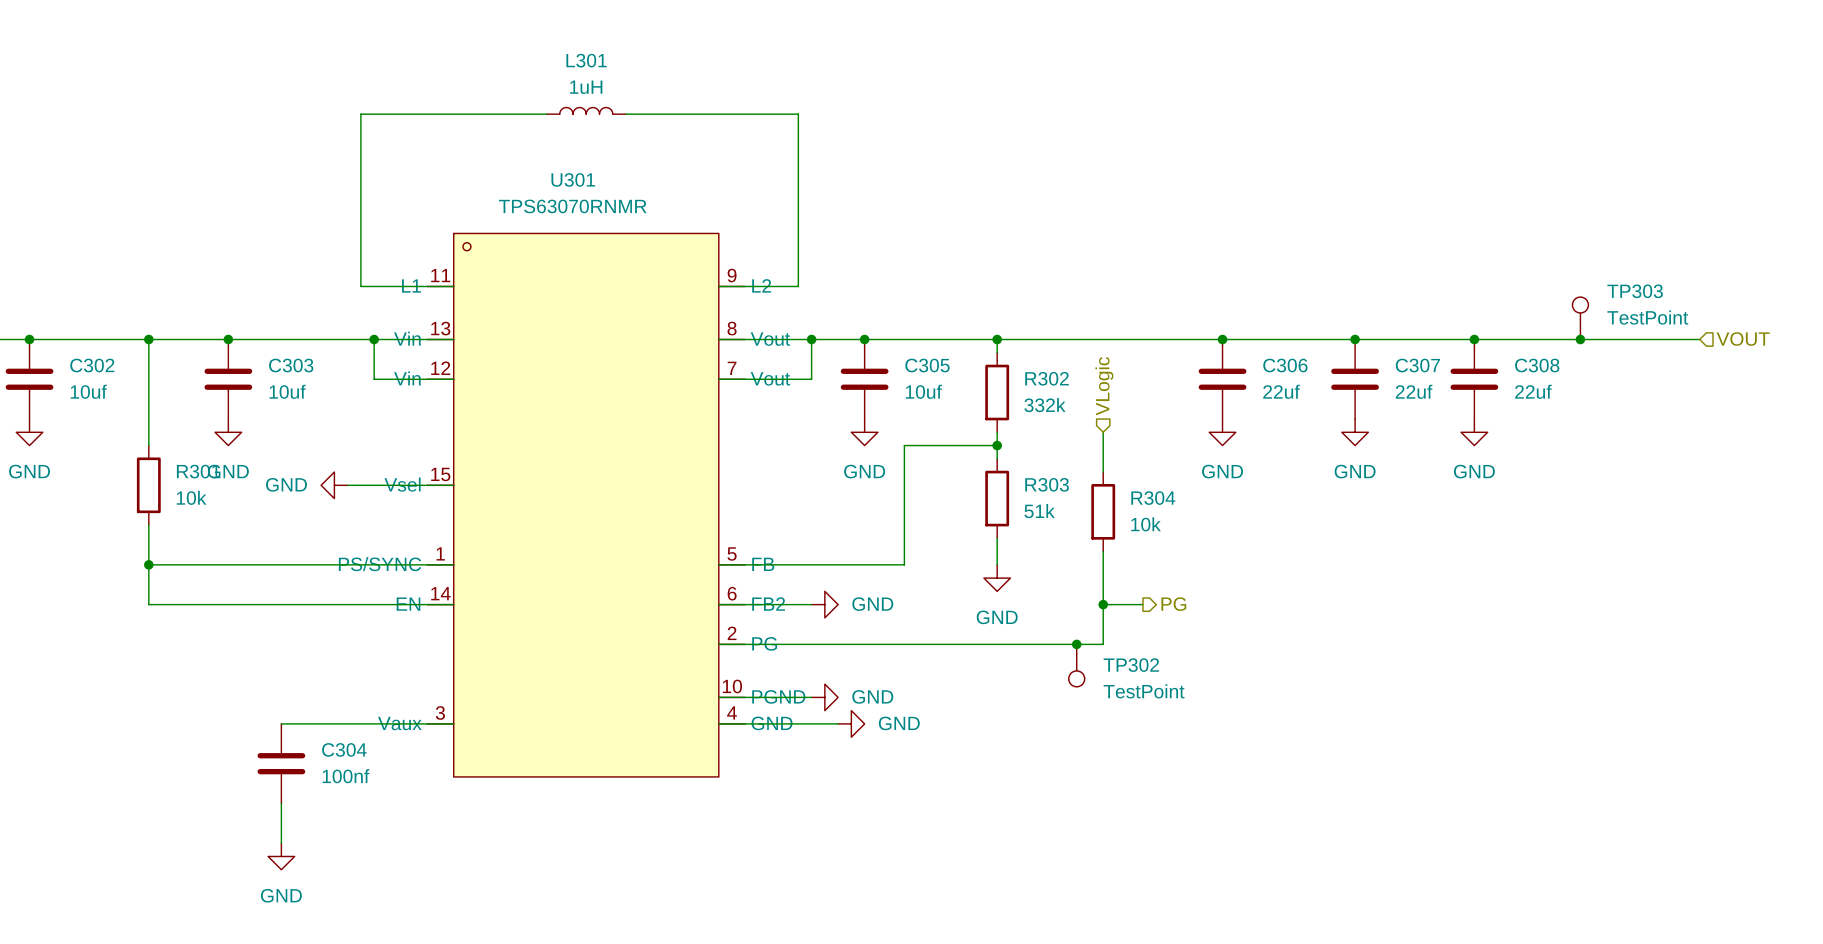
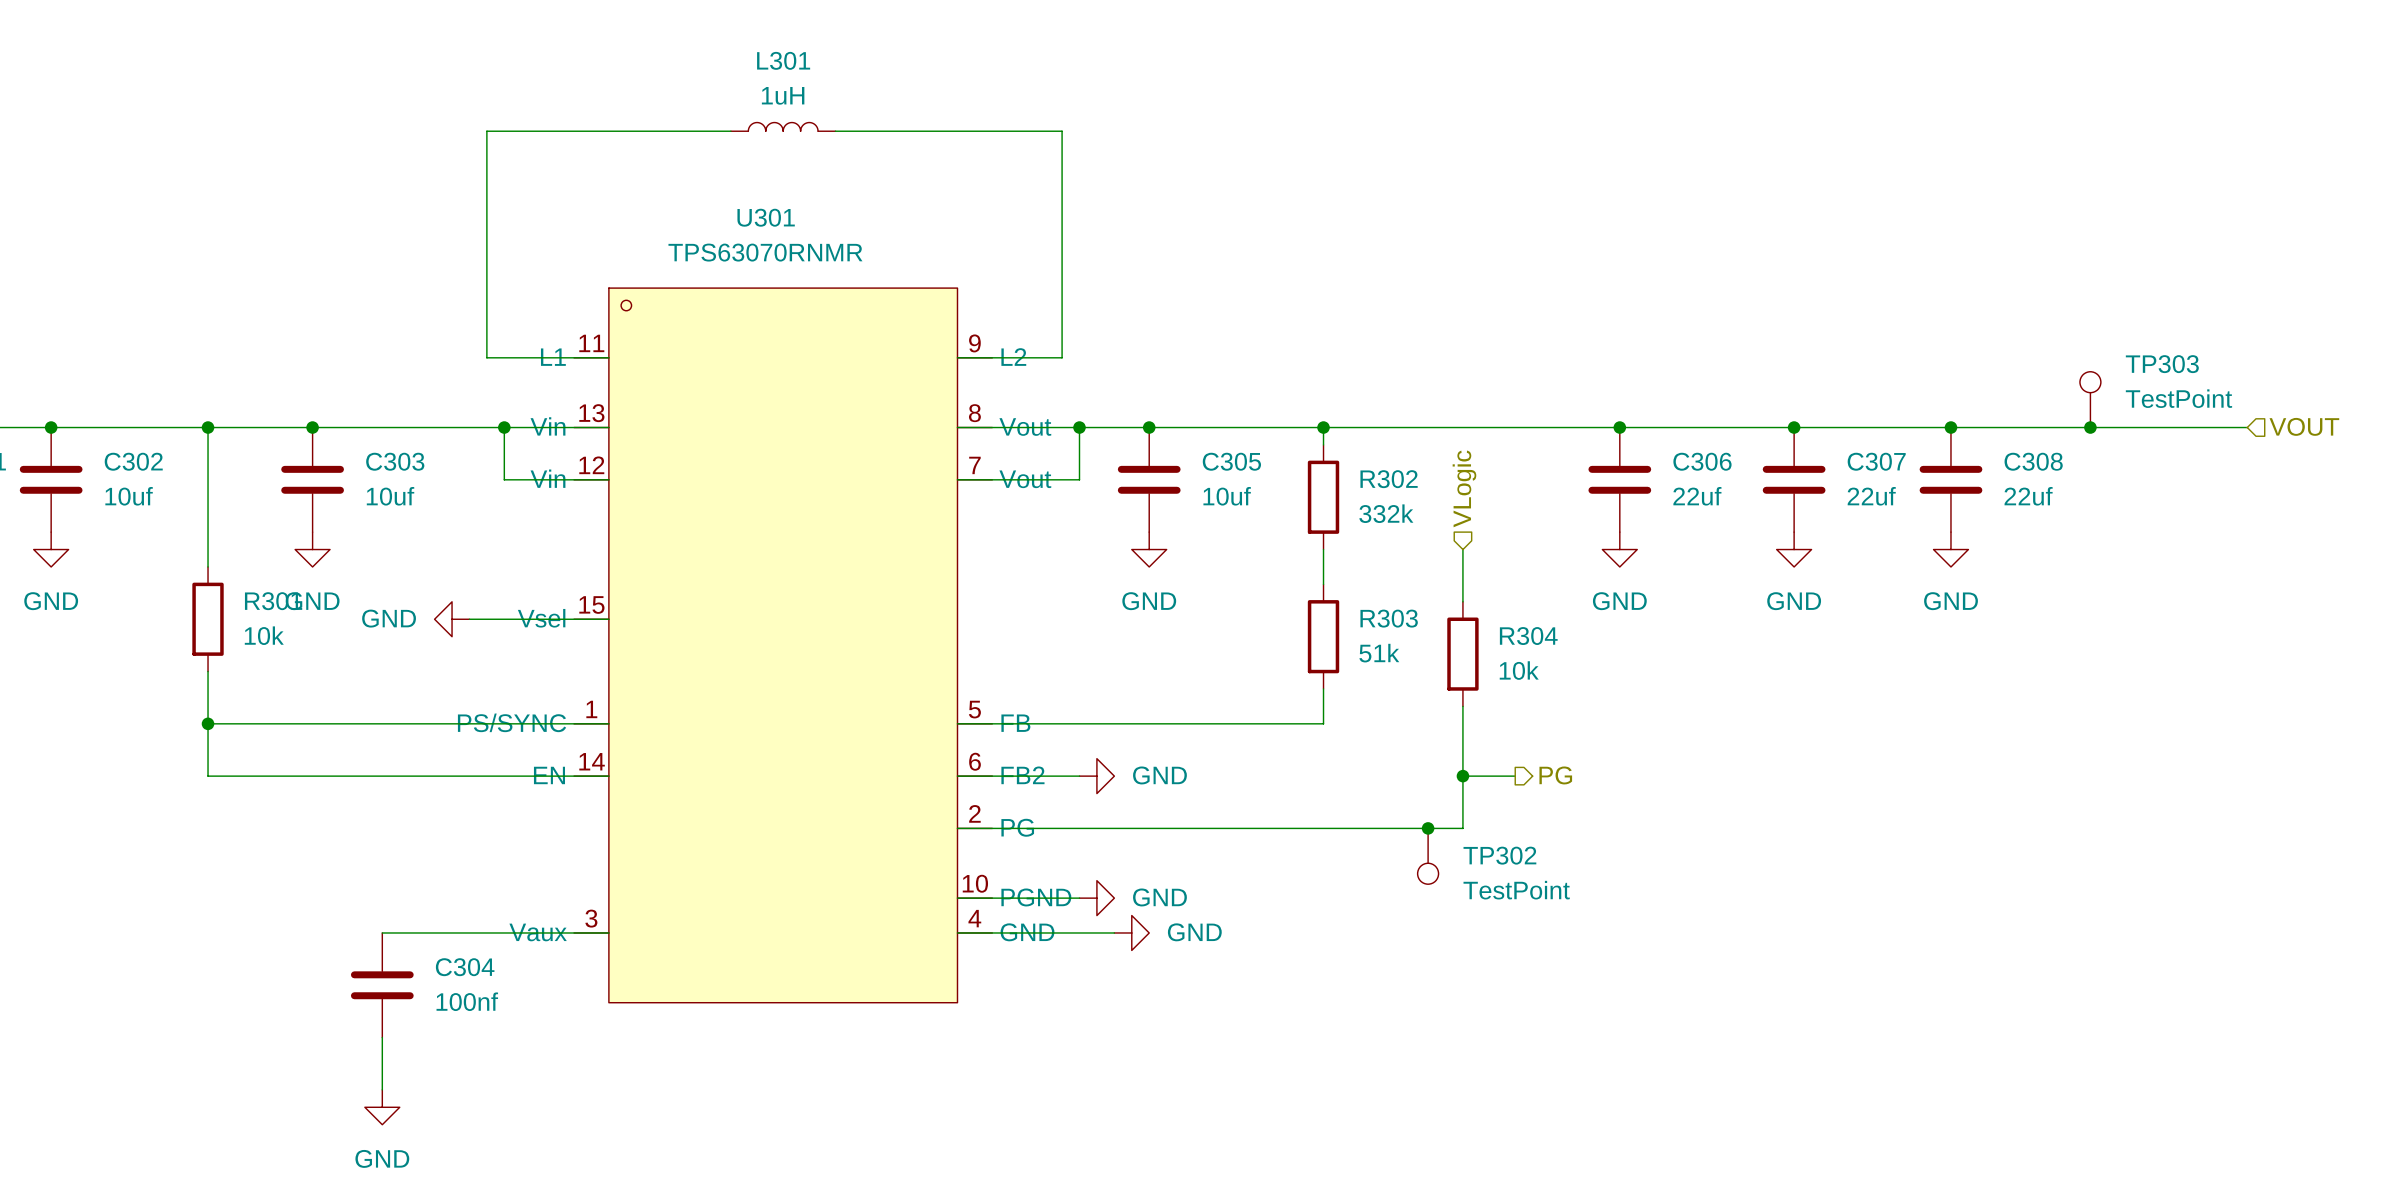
wire: (997, 445) (904, 445) (904, 564) -> (1323, 723) (1201, 723)
junction: (997, 445) -> none
power symbol: GND (997, 578) -> none

